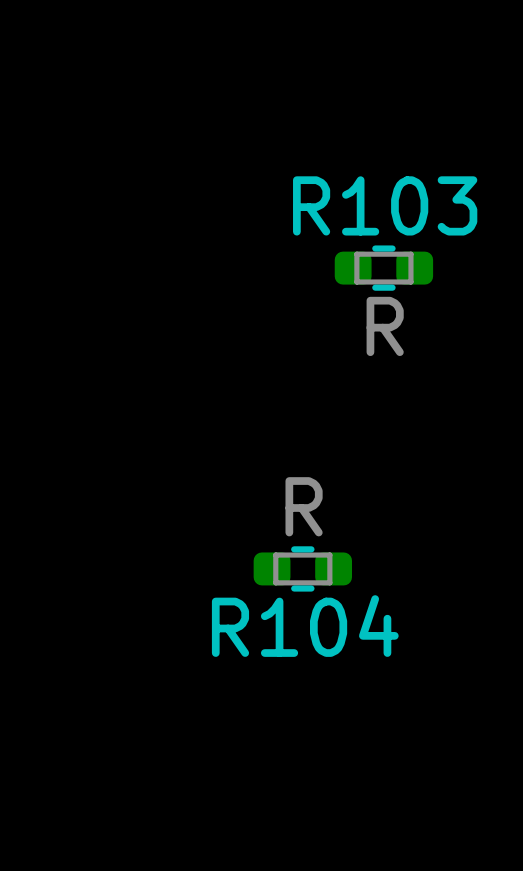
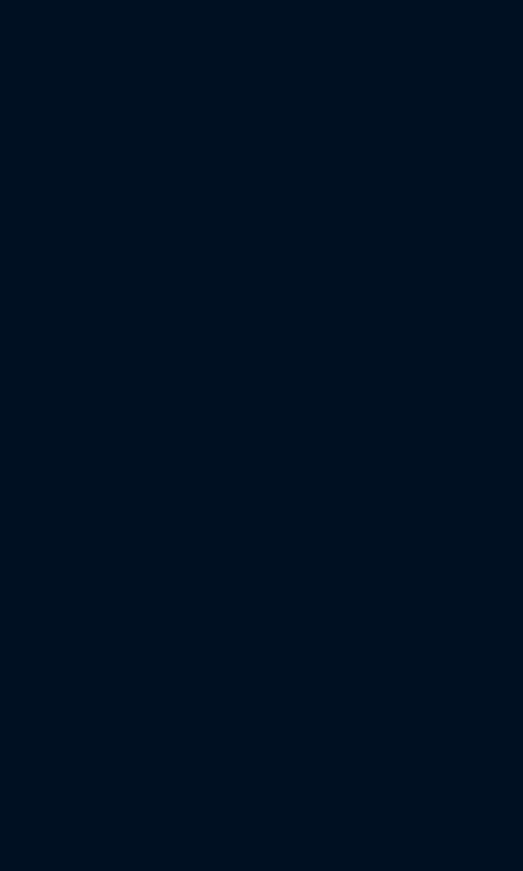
R103: R (383, 268) -> none
R104: R (302, 568) -> none

